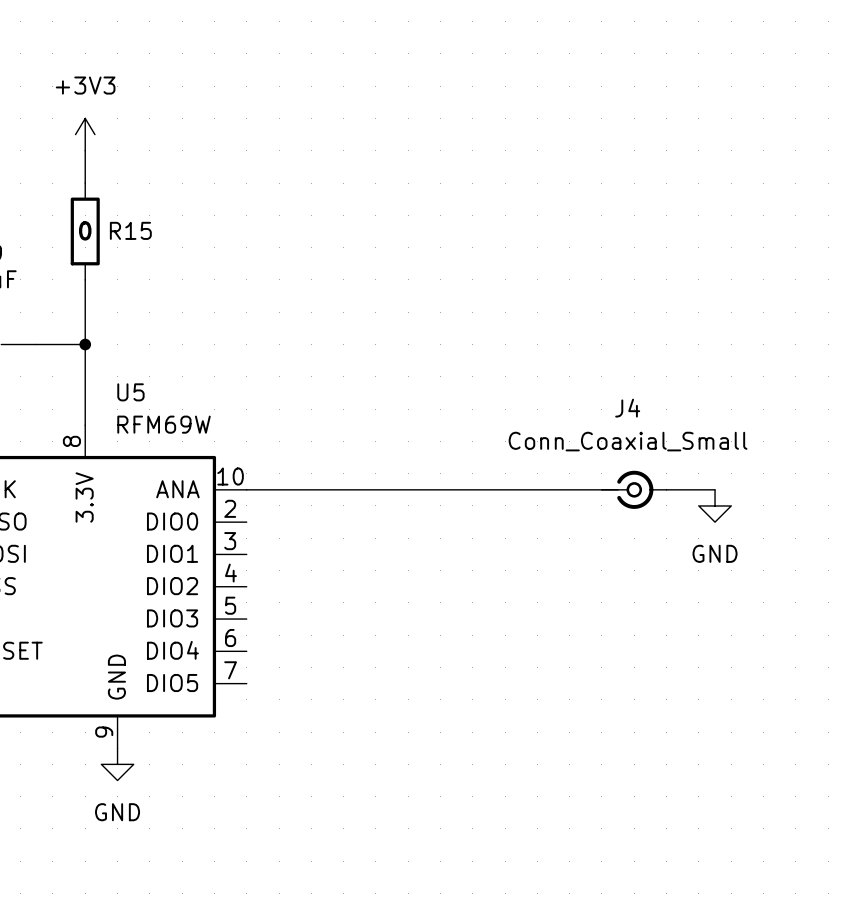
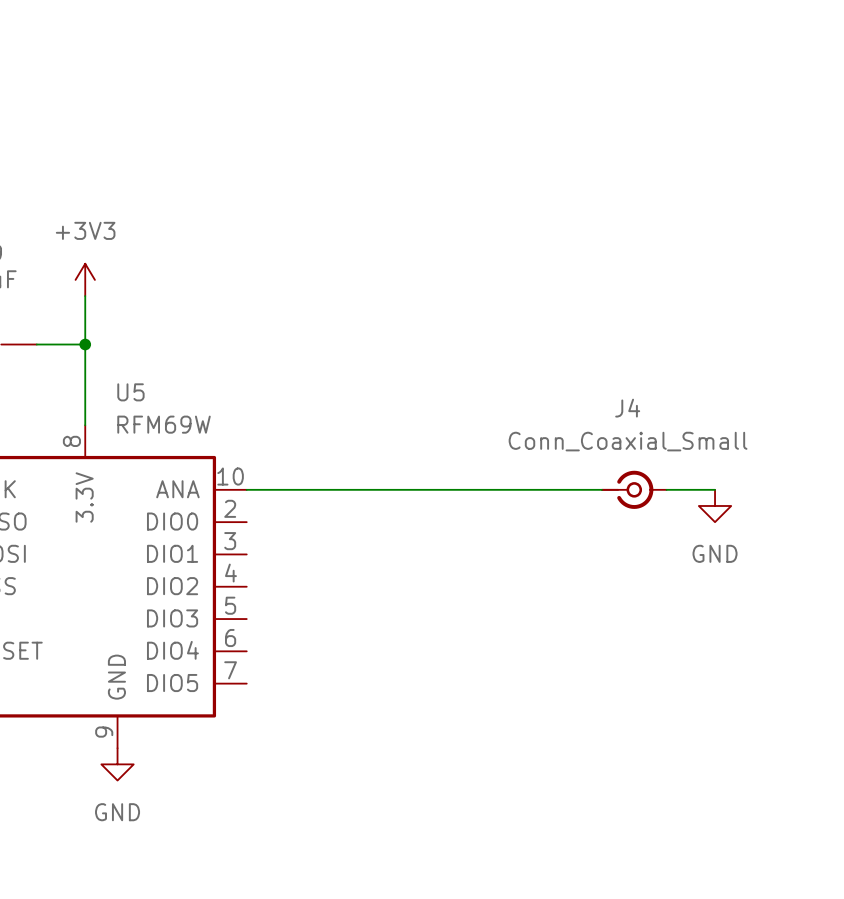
power symbol position: +3V3 (85, 134) -> +3V3 (85, 279)
wire: (85, 150) (85, 183) -> none
R15: 0 (85, 231) -> none

